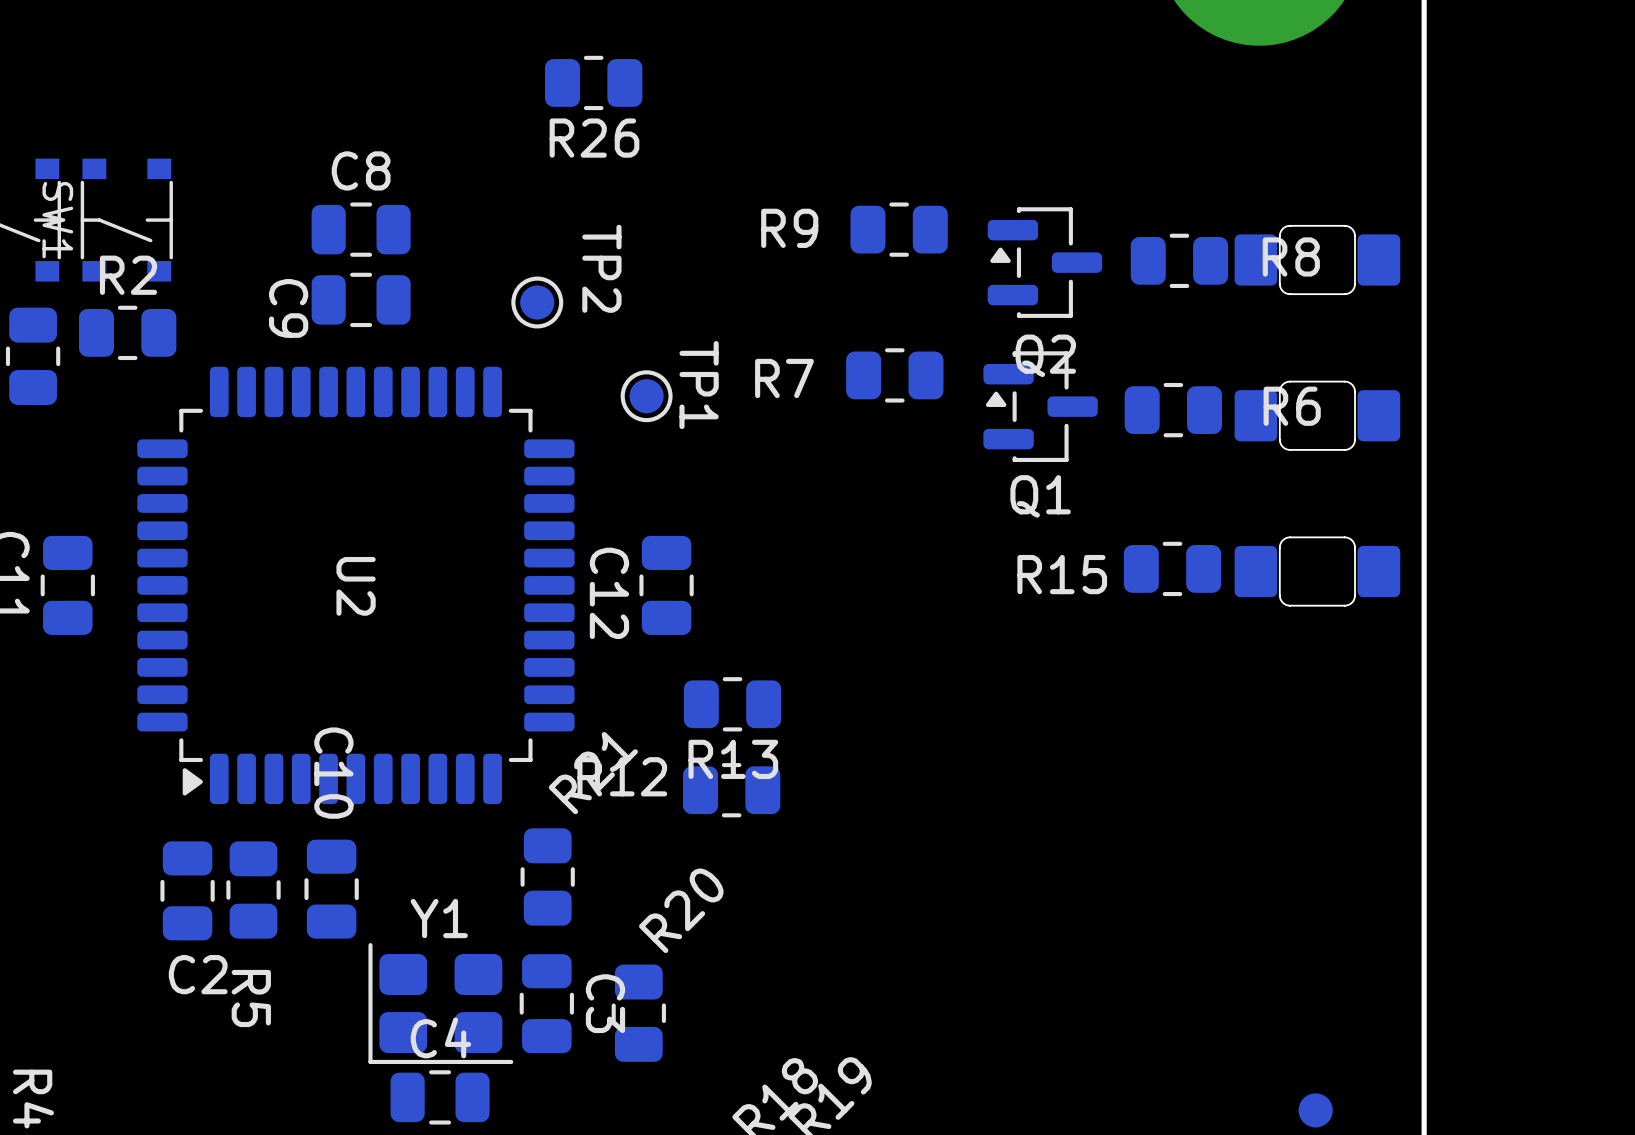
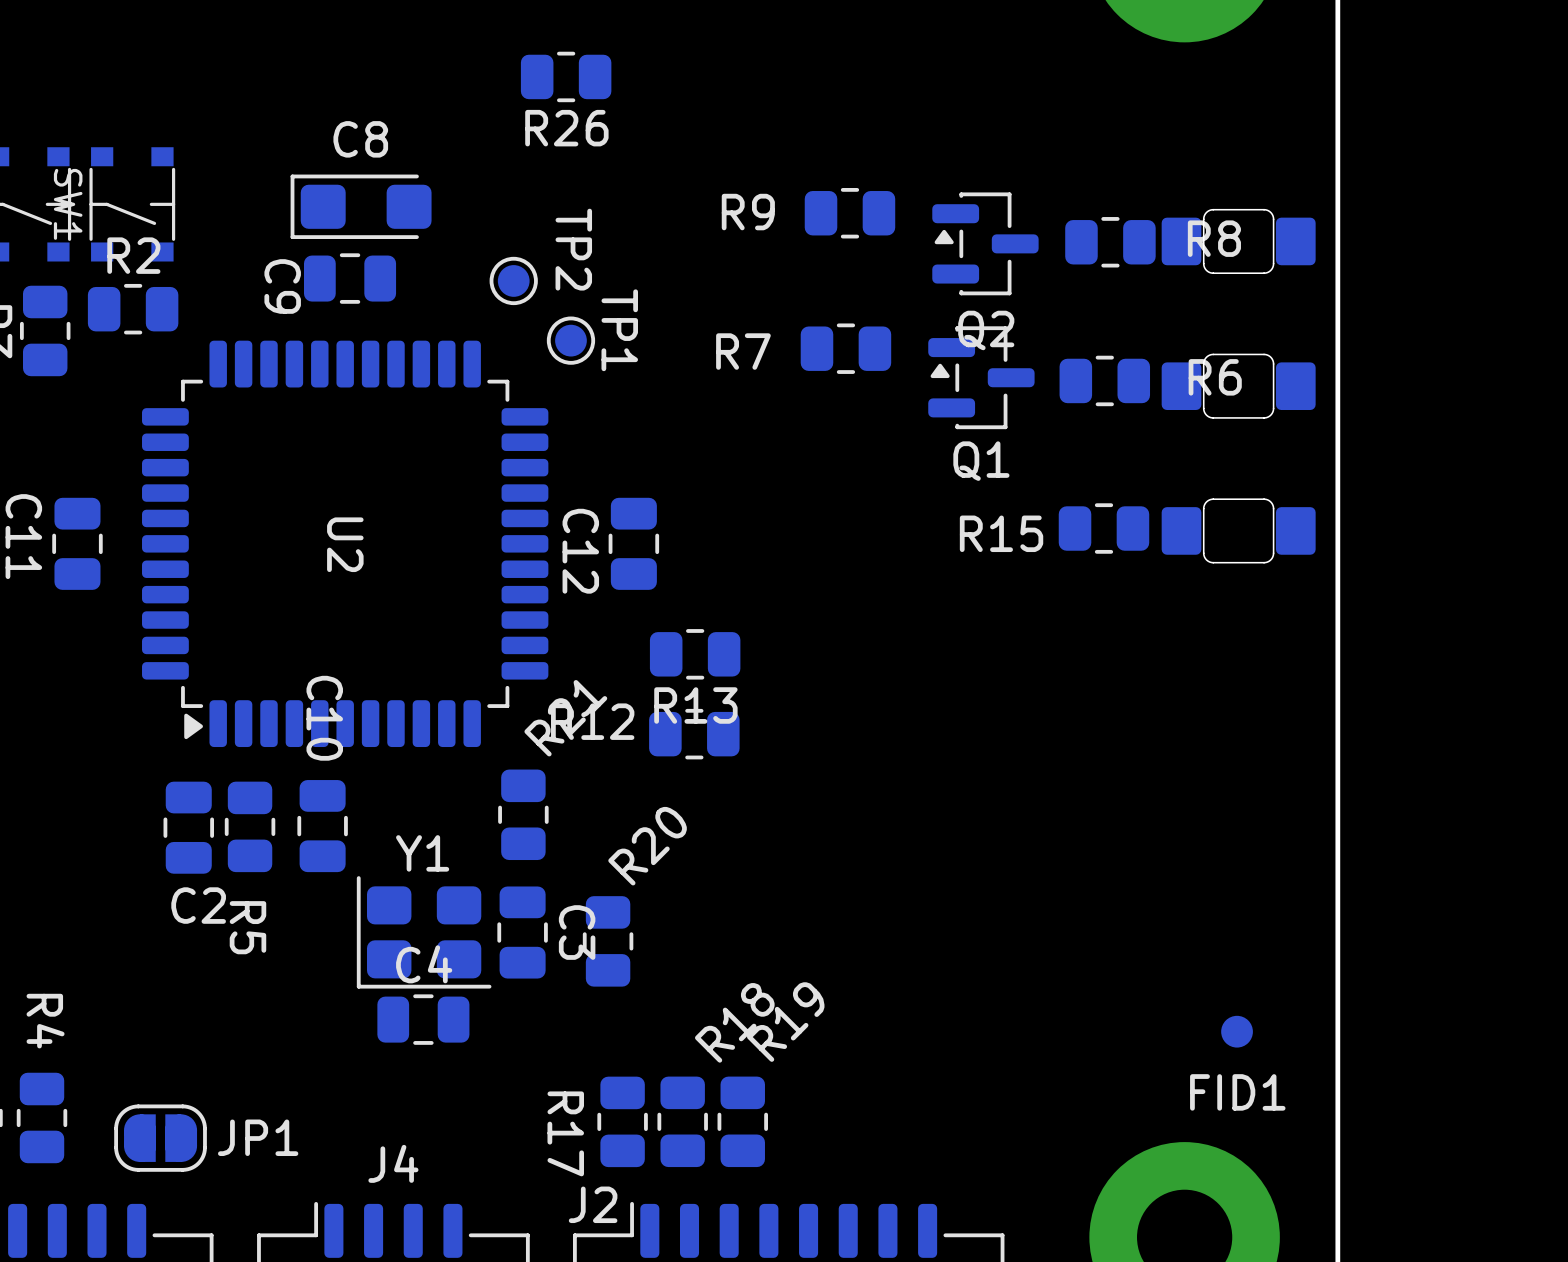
C8 footprint: [311, 202, 411, 257] -> [290, 174, 432, 240]
TP1 position: (646, 396) -> (570, 340)

